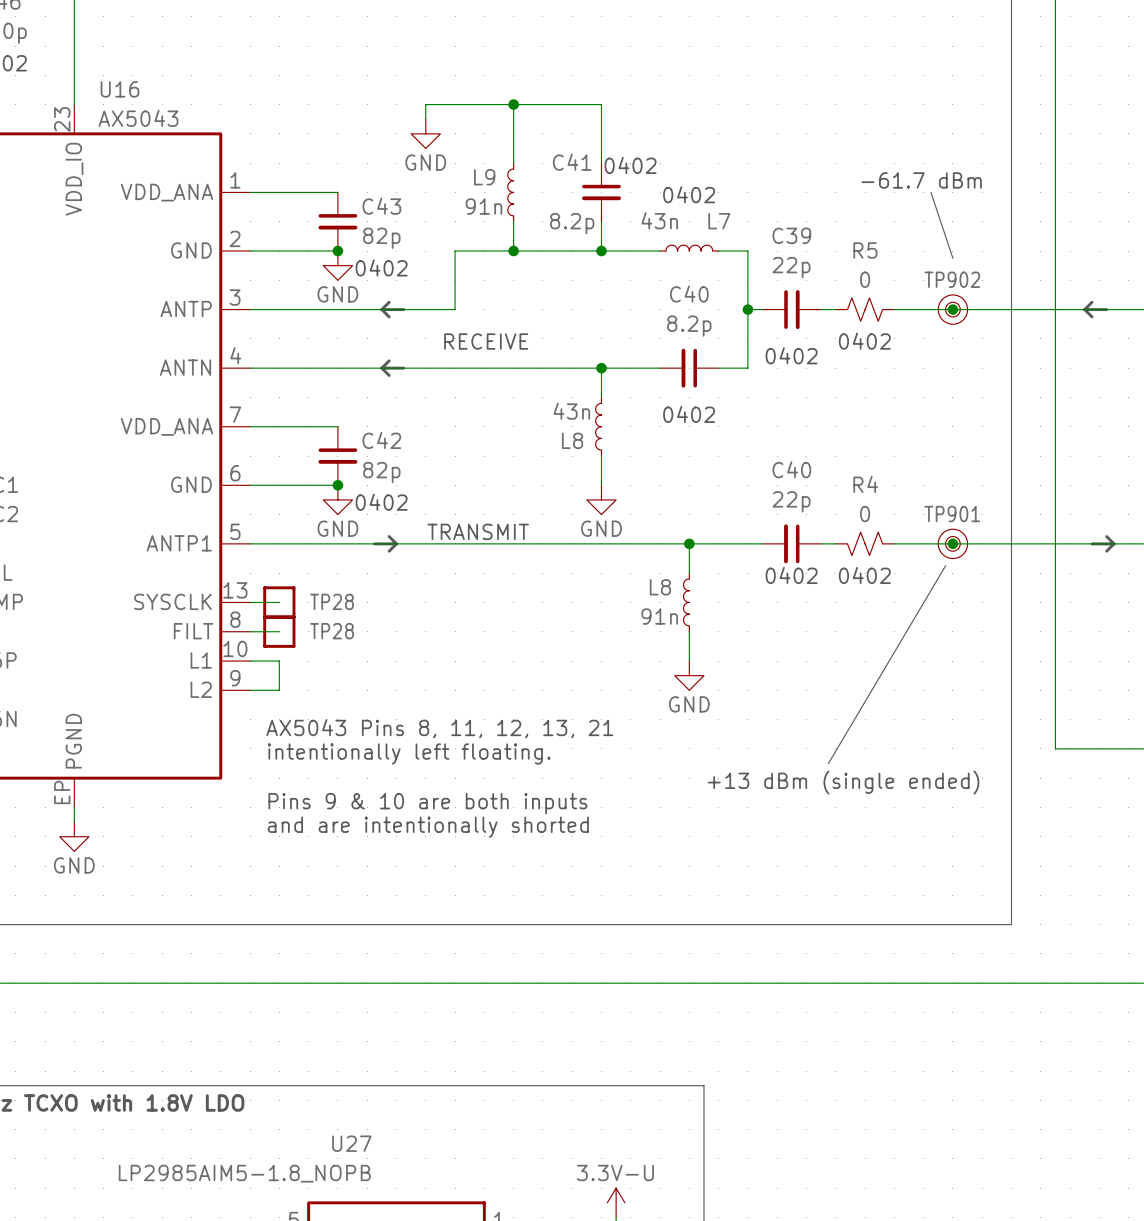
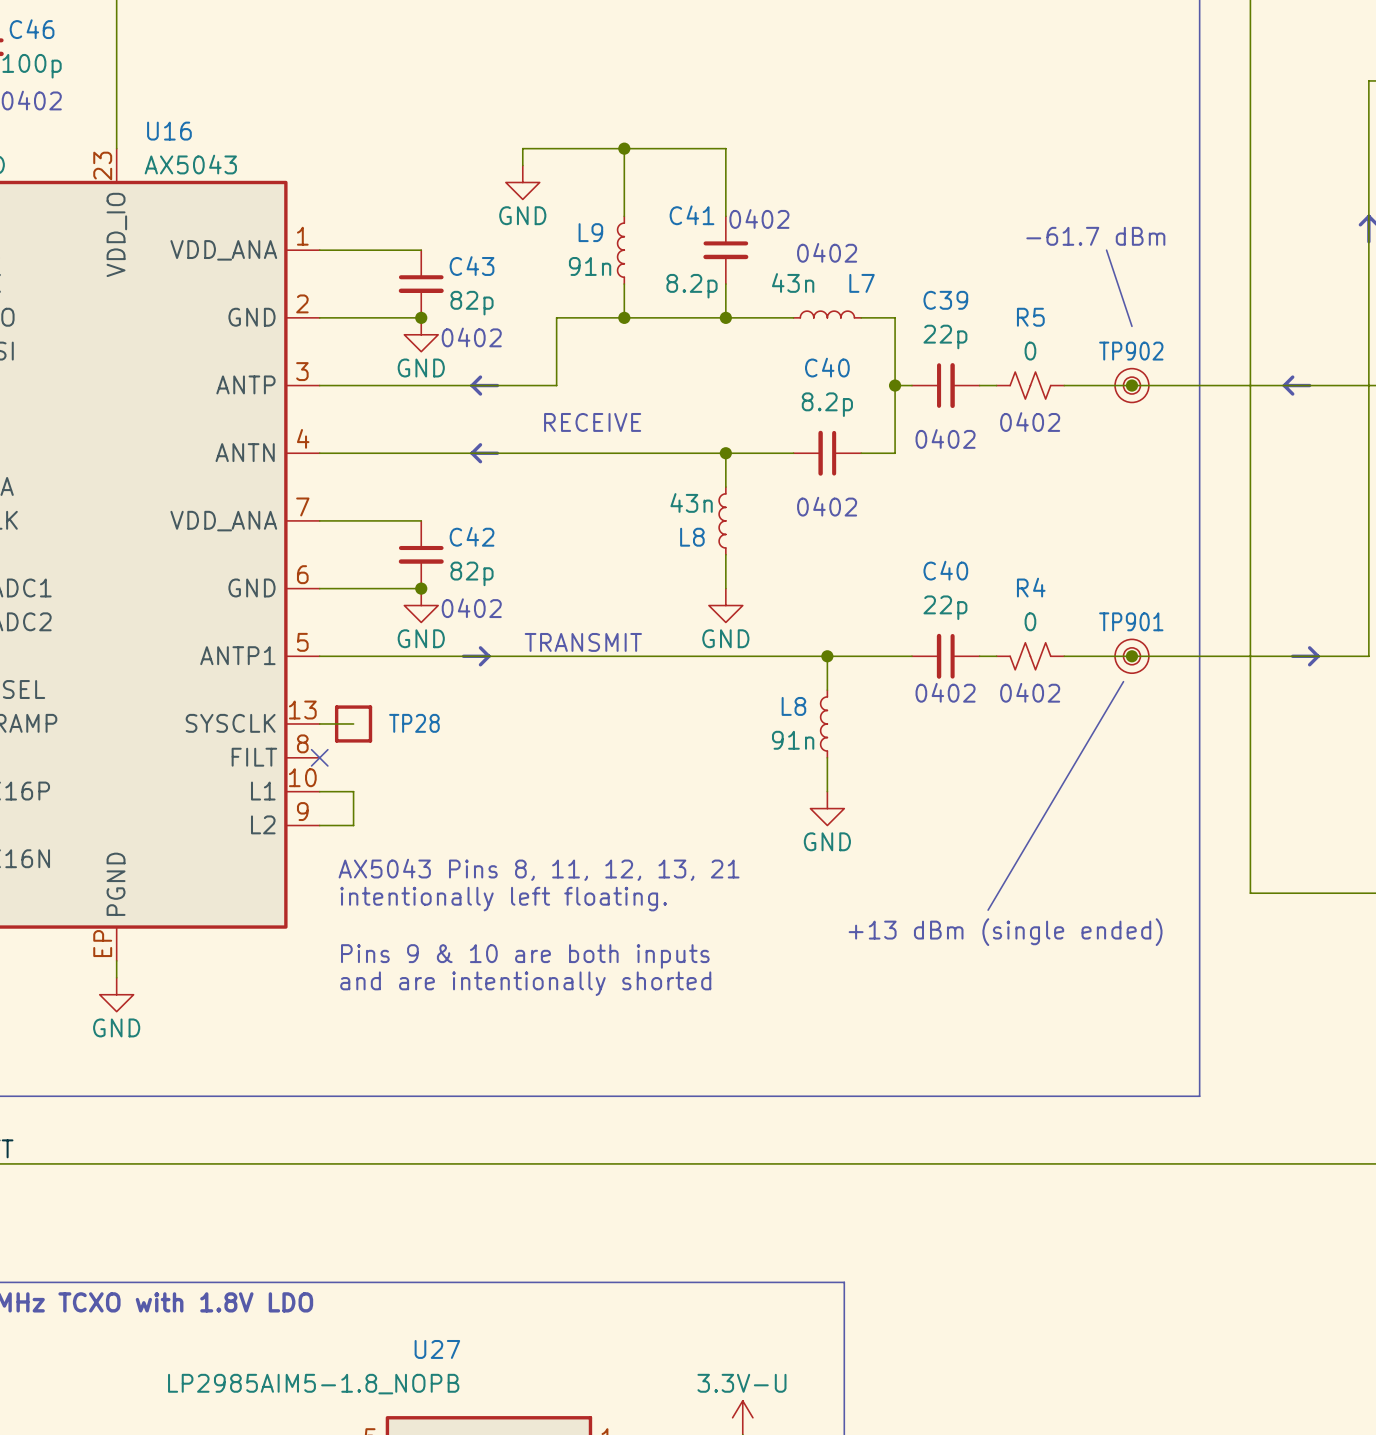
wire: (250, 631) (279, 631) -> none
no-connect mark: none -> (319, 757)
TP28: (279, 631) -> none

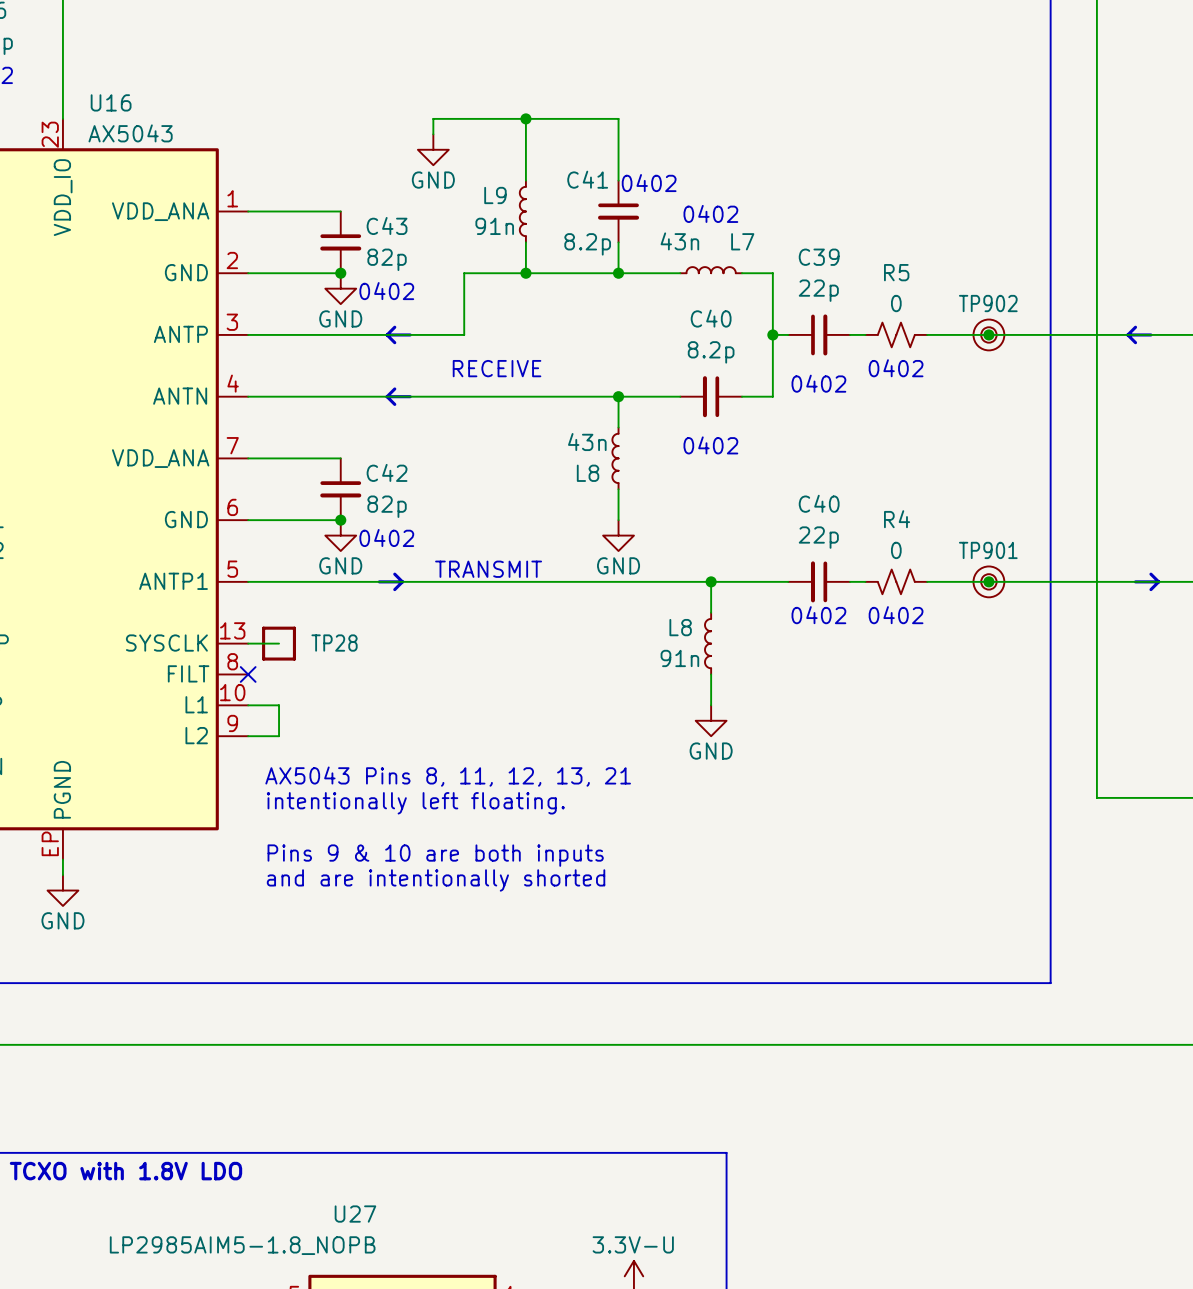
text: -61.7 dBm (1095, 236) -> none
line: (1106, 250) (1131, 326) -> none
line: (1123, 681) (988, 910) -> none
text: +13 dBm (single ended) (1005, 932) -> none

